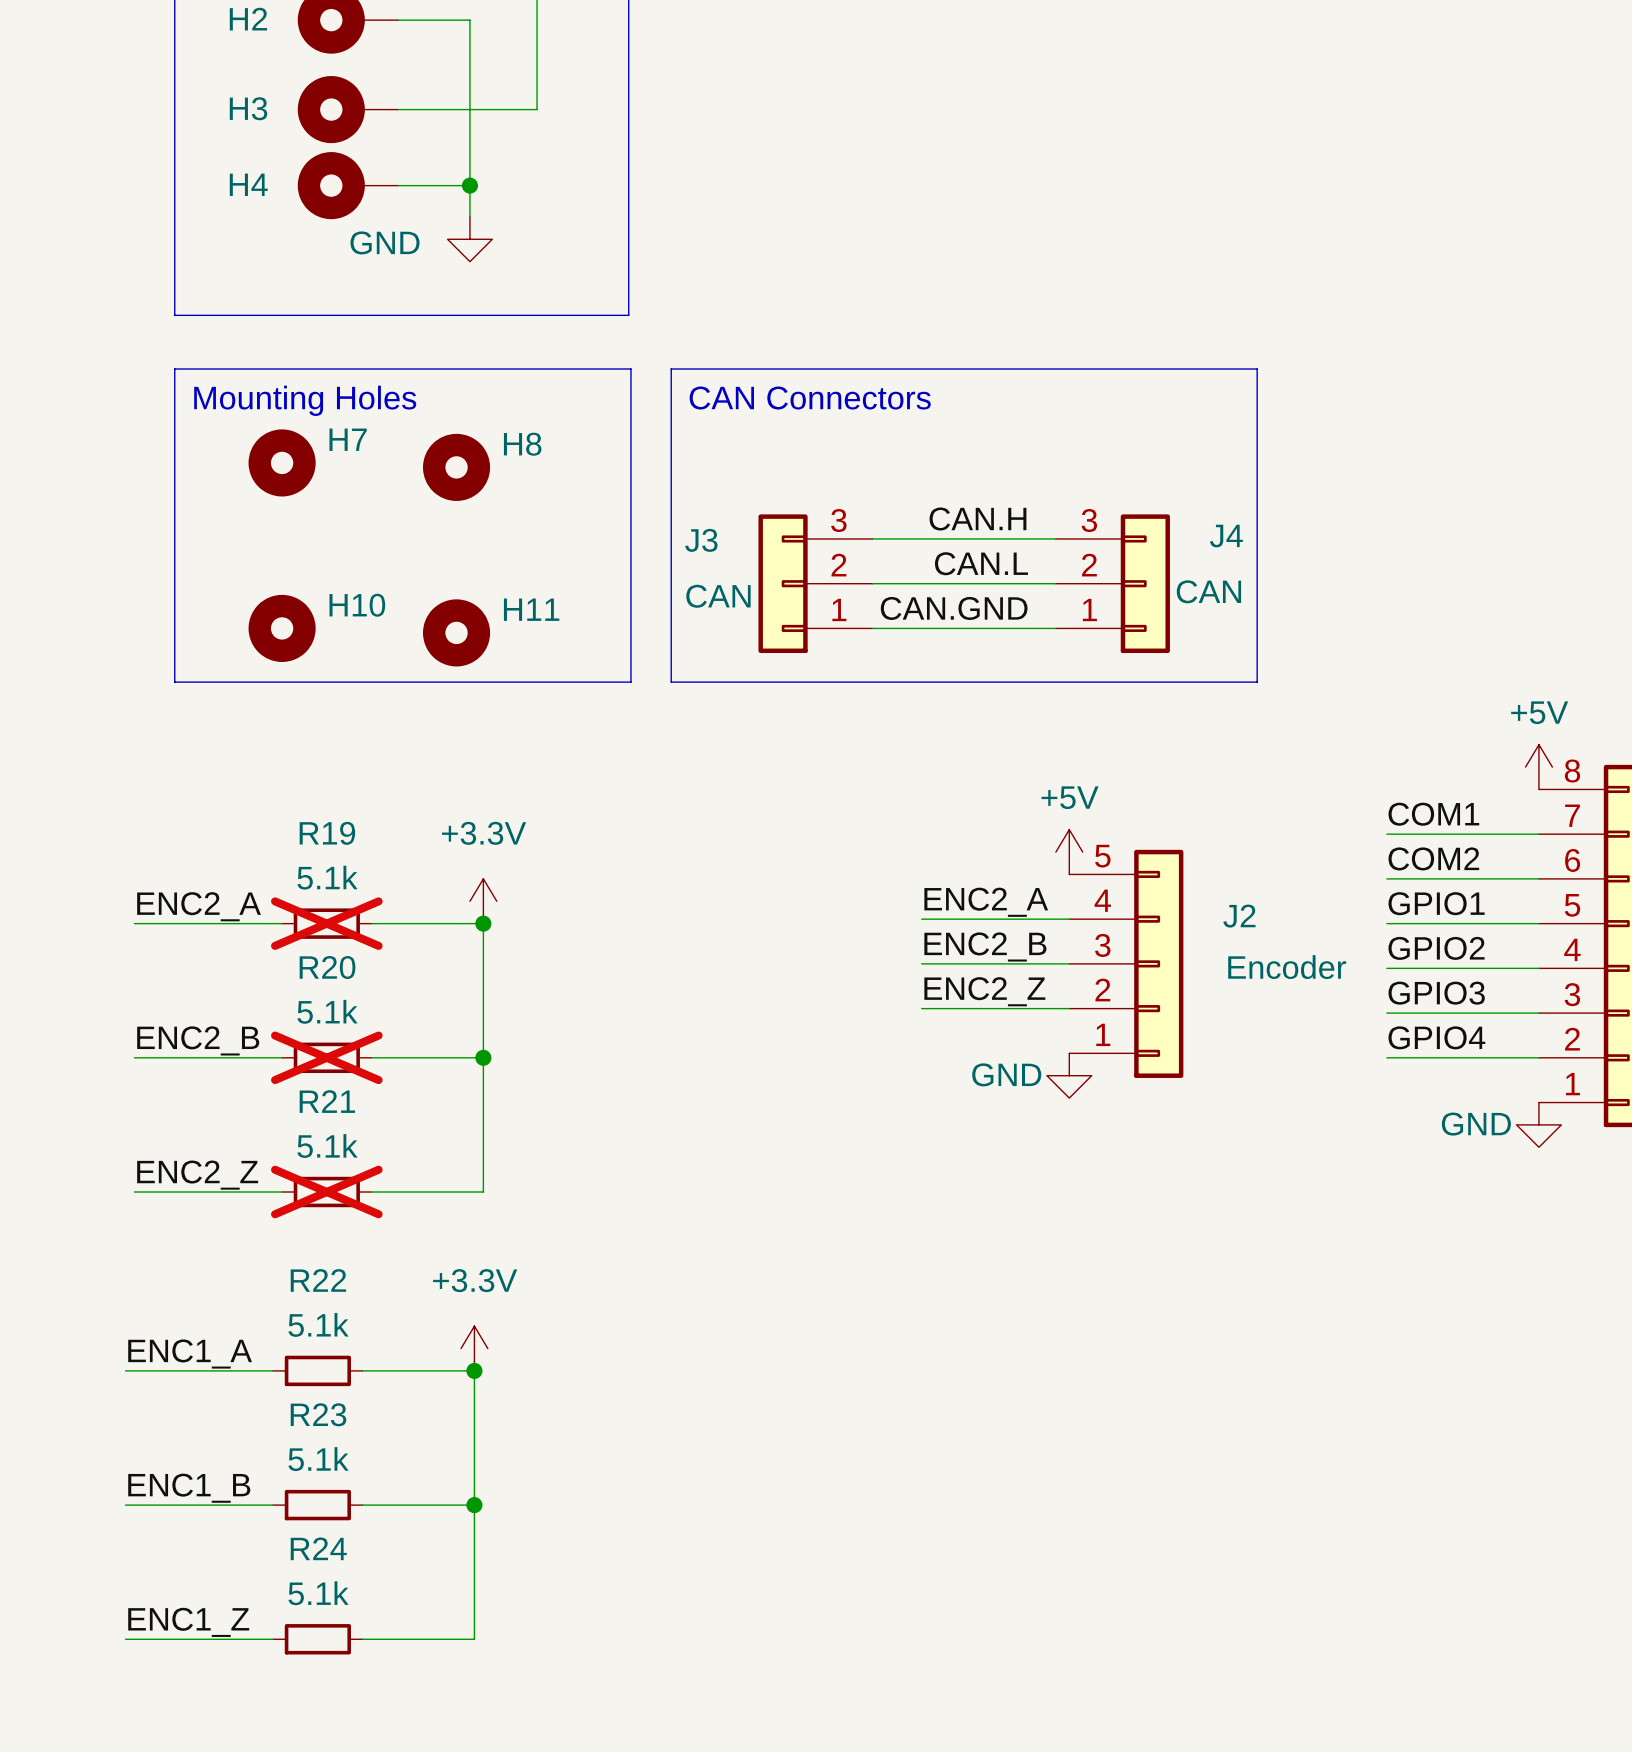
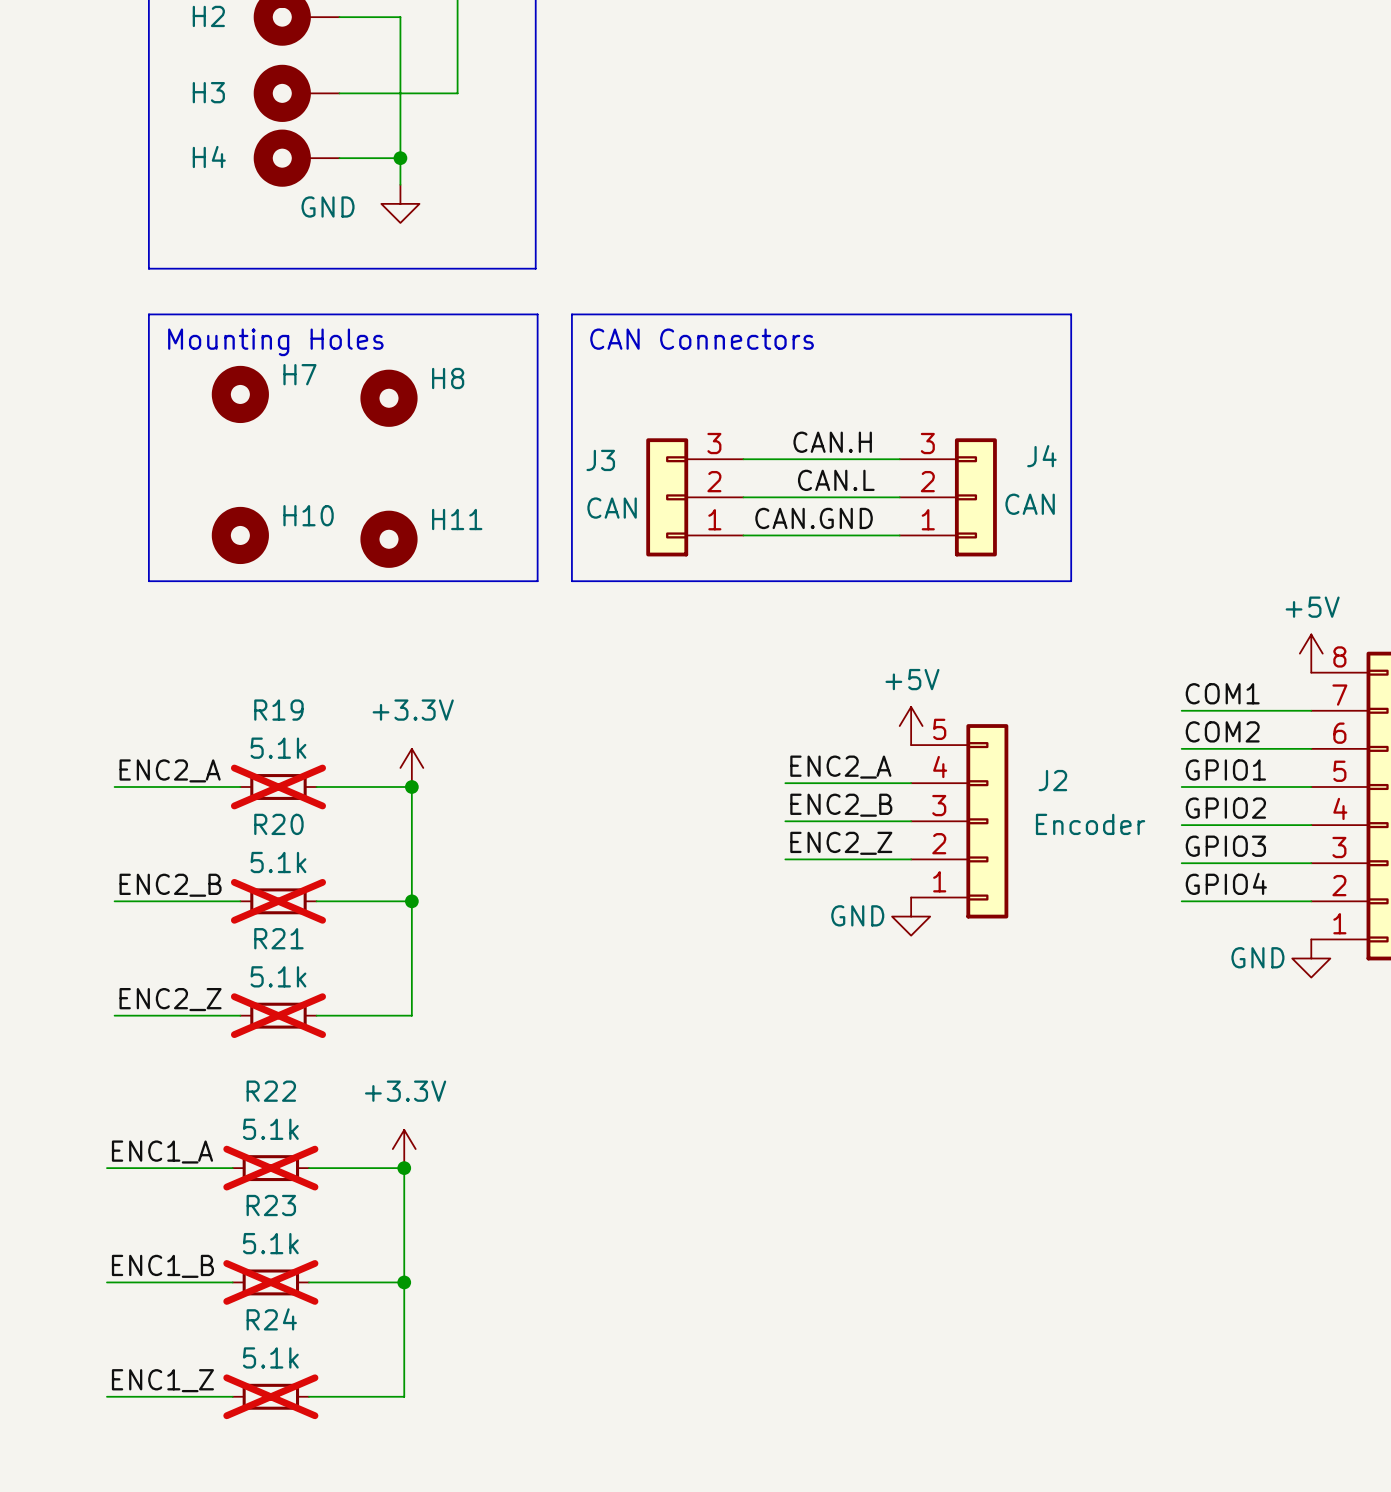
R22 do-not-place cross: none -> (270, 1168)
R23 do-not-place cross: none -> (270, 1282)
R24 do-not-place cross: none -> (270, 1396)

